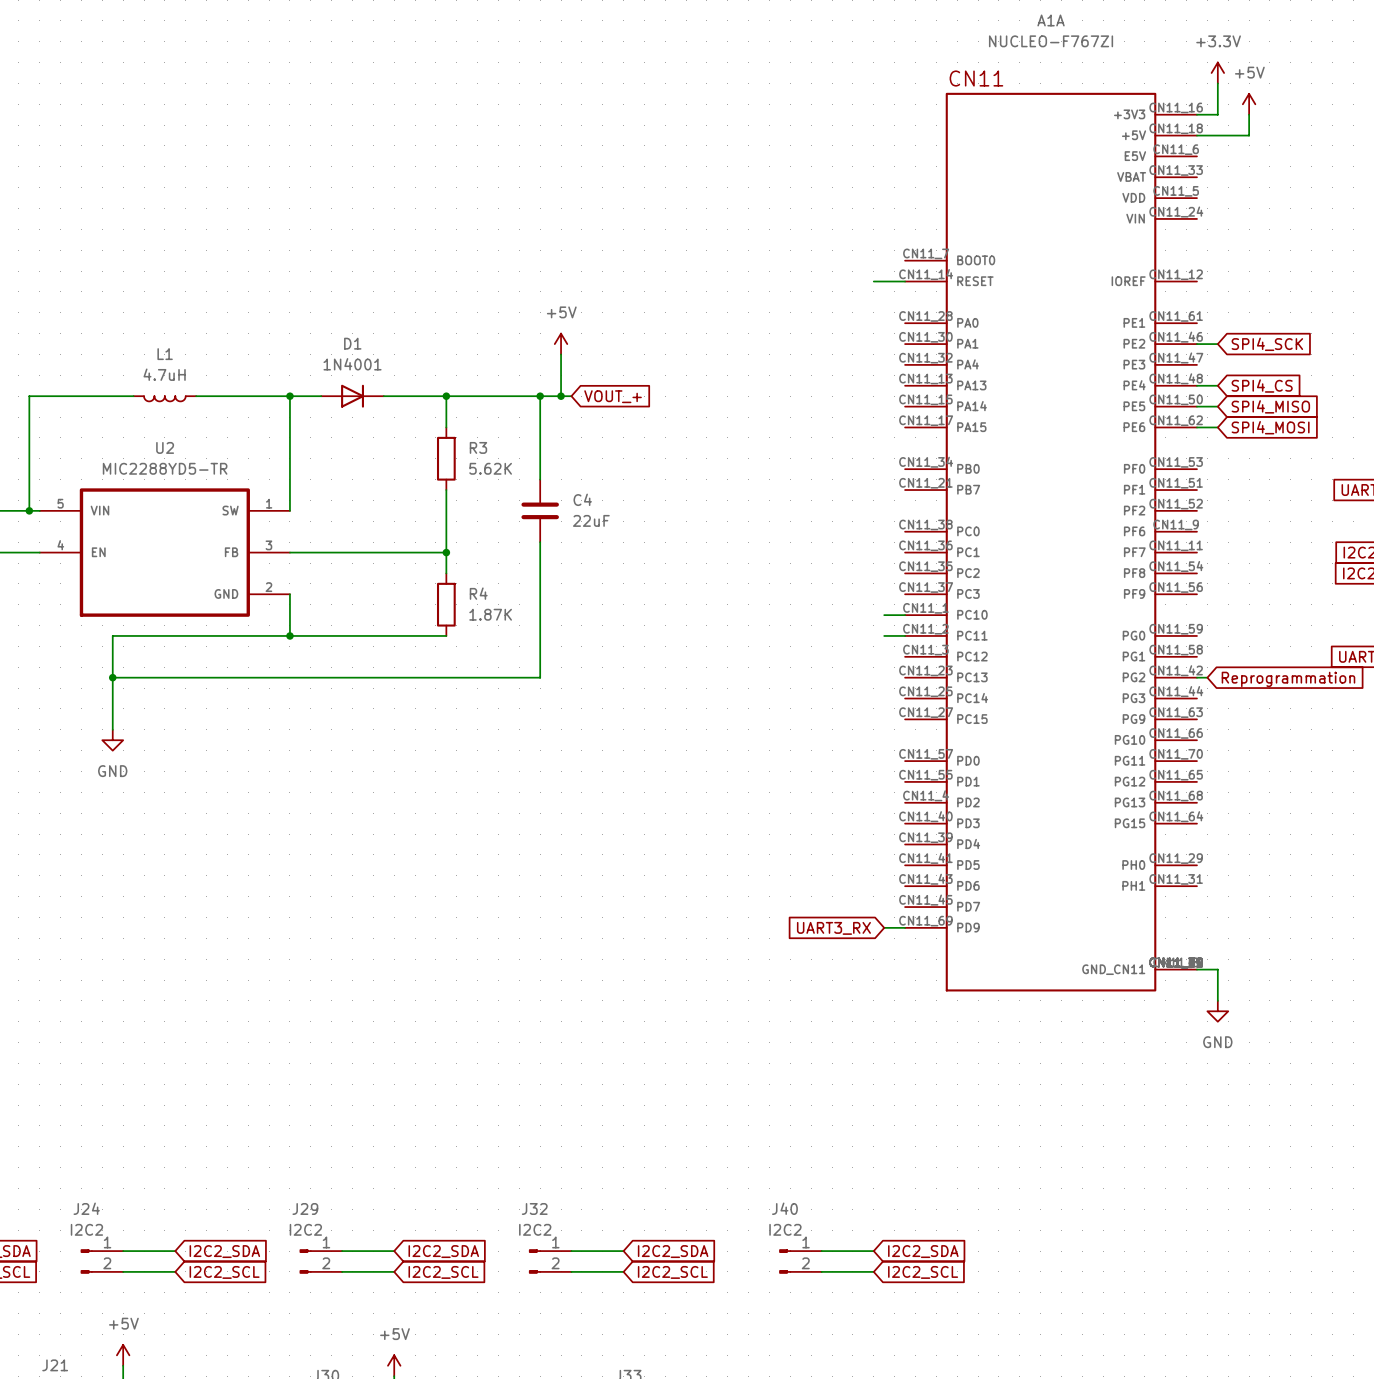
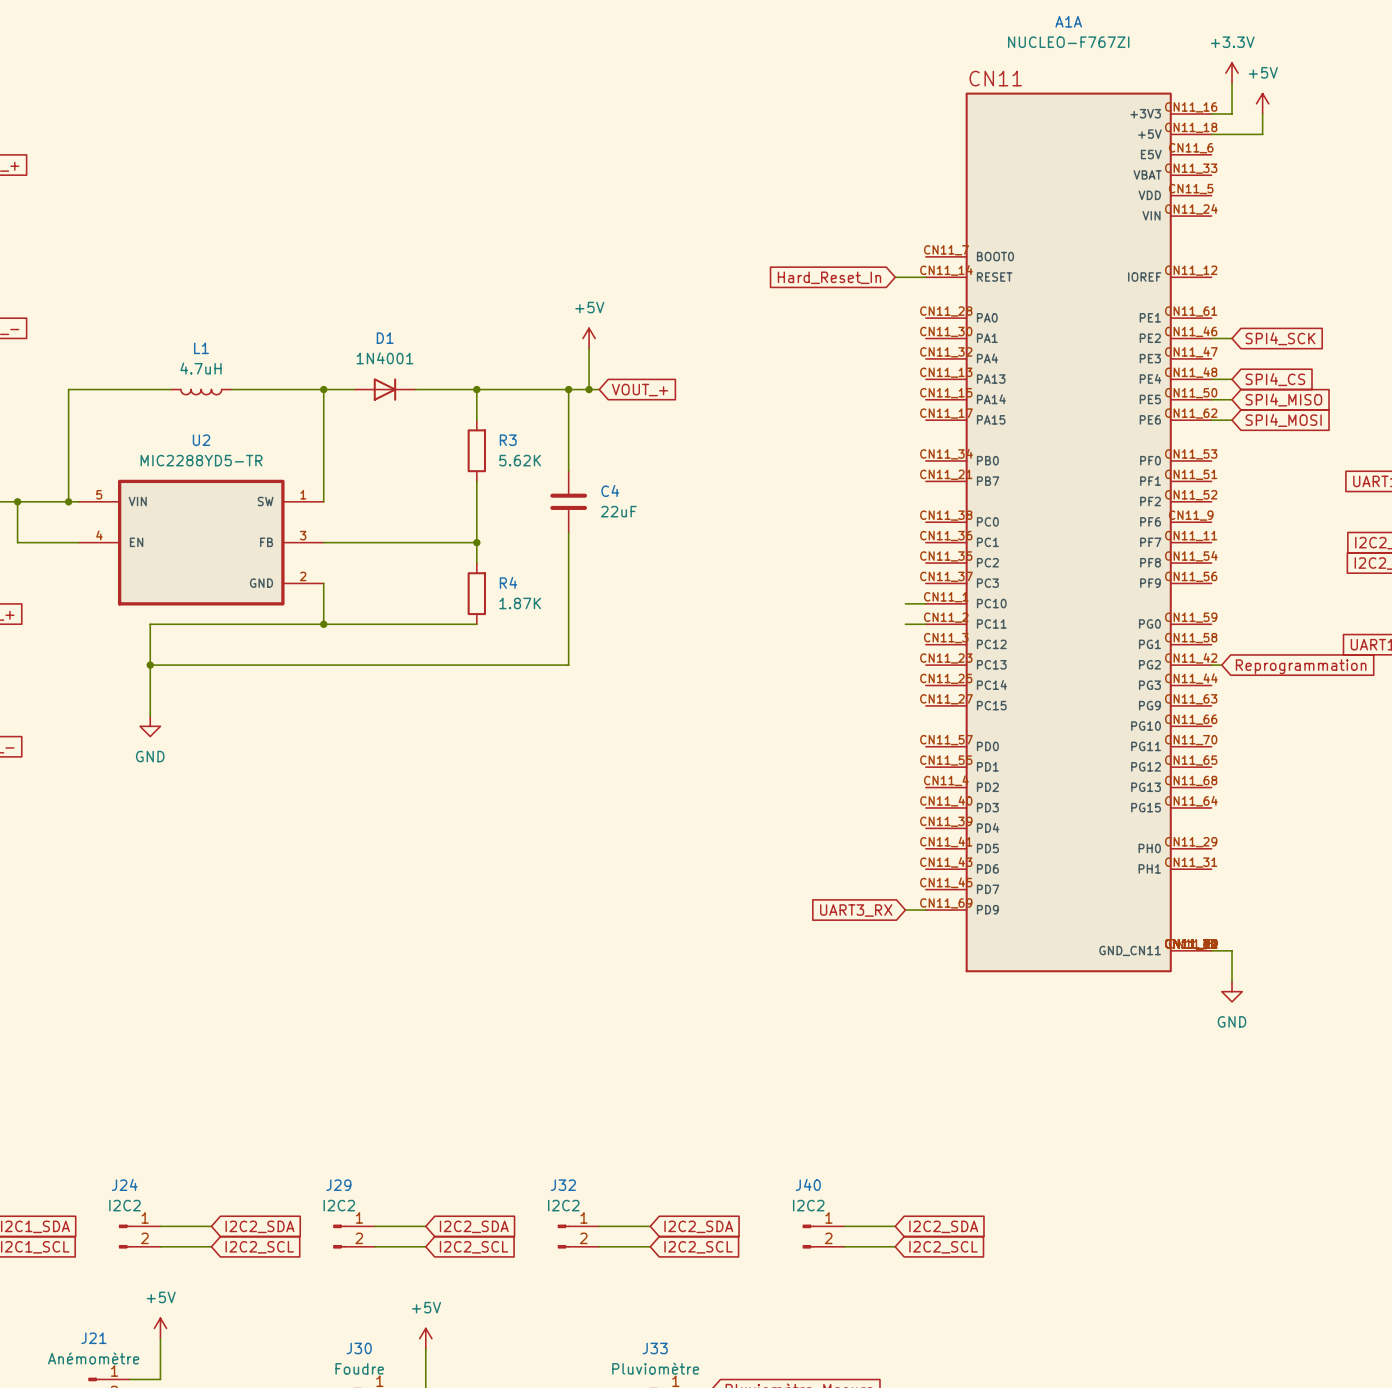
global label: none -> Hard_Reset_In (829, 277)

